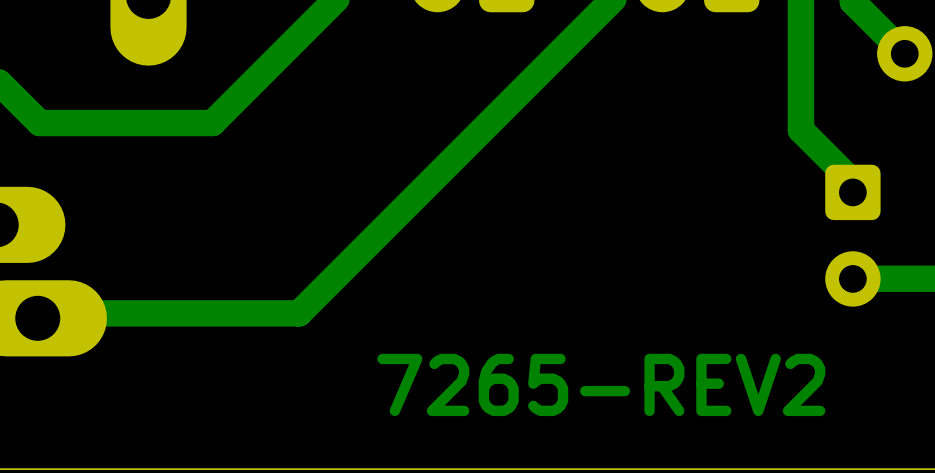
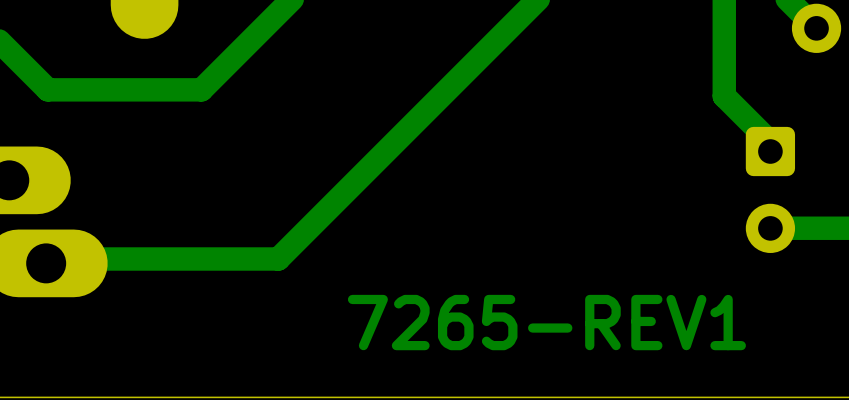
text: 7265-REV2 (601, 384) -> 7265-REV1 (546, 322)

